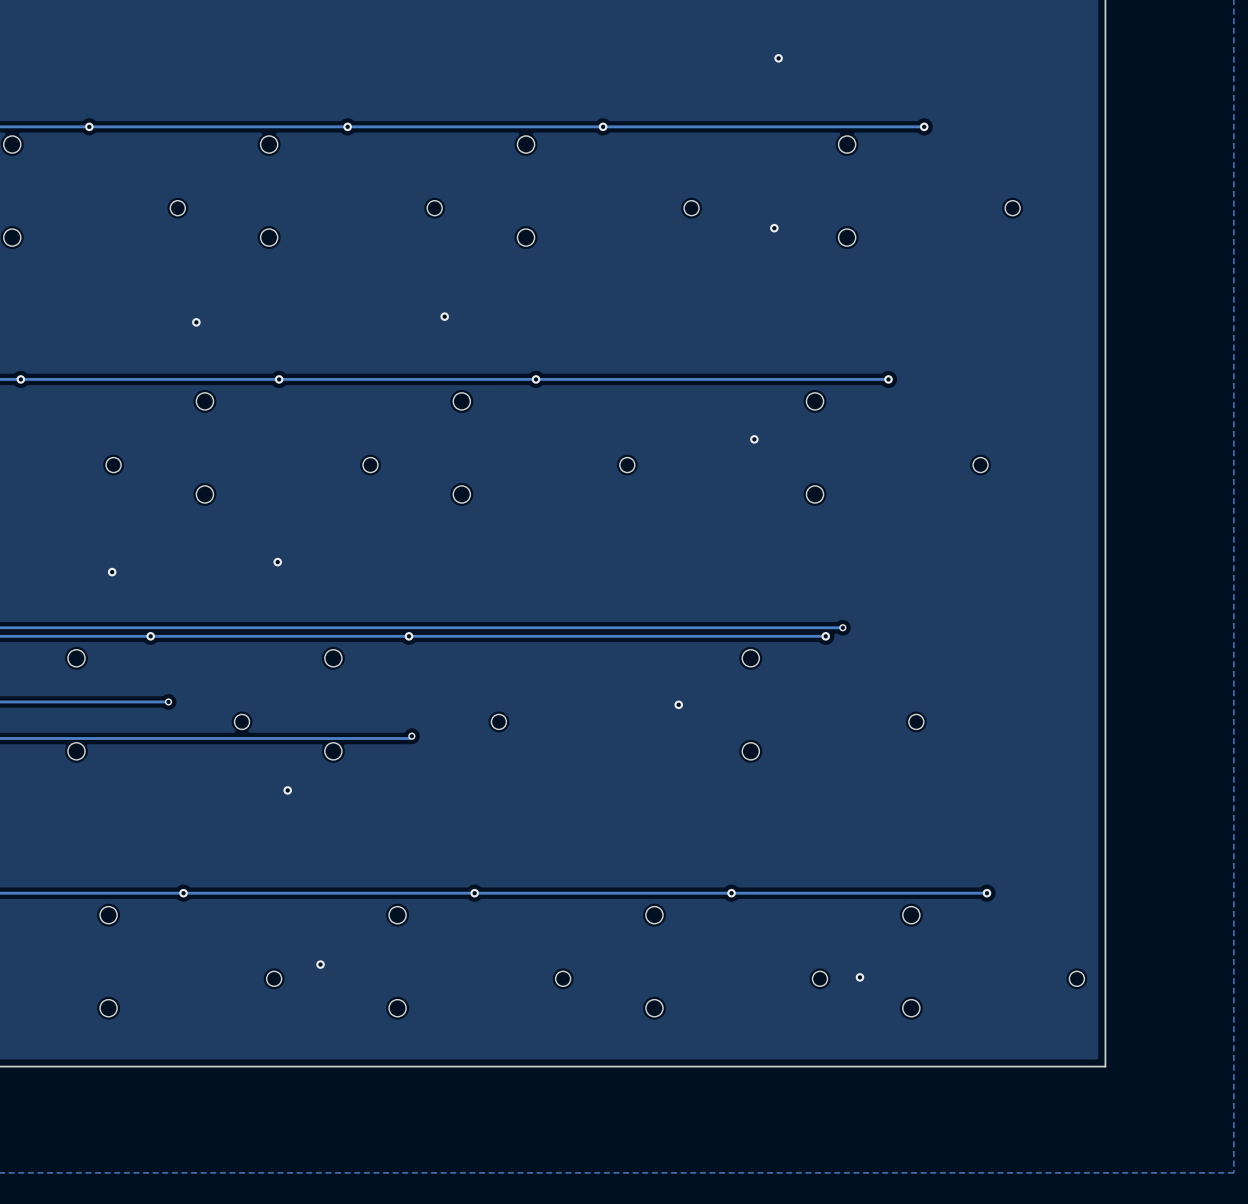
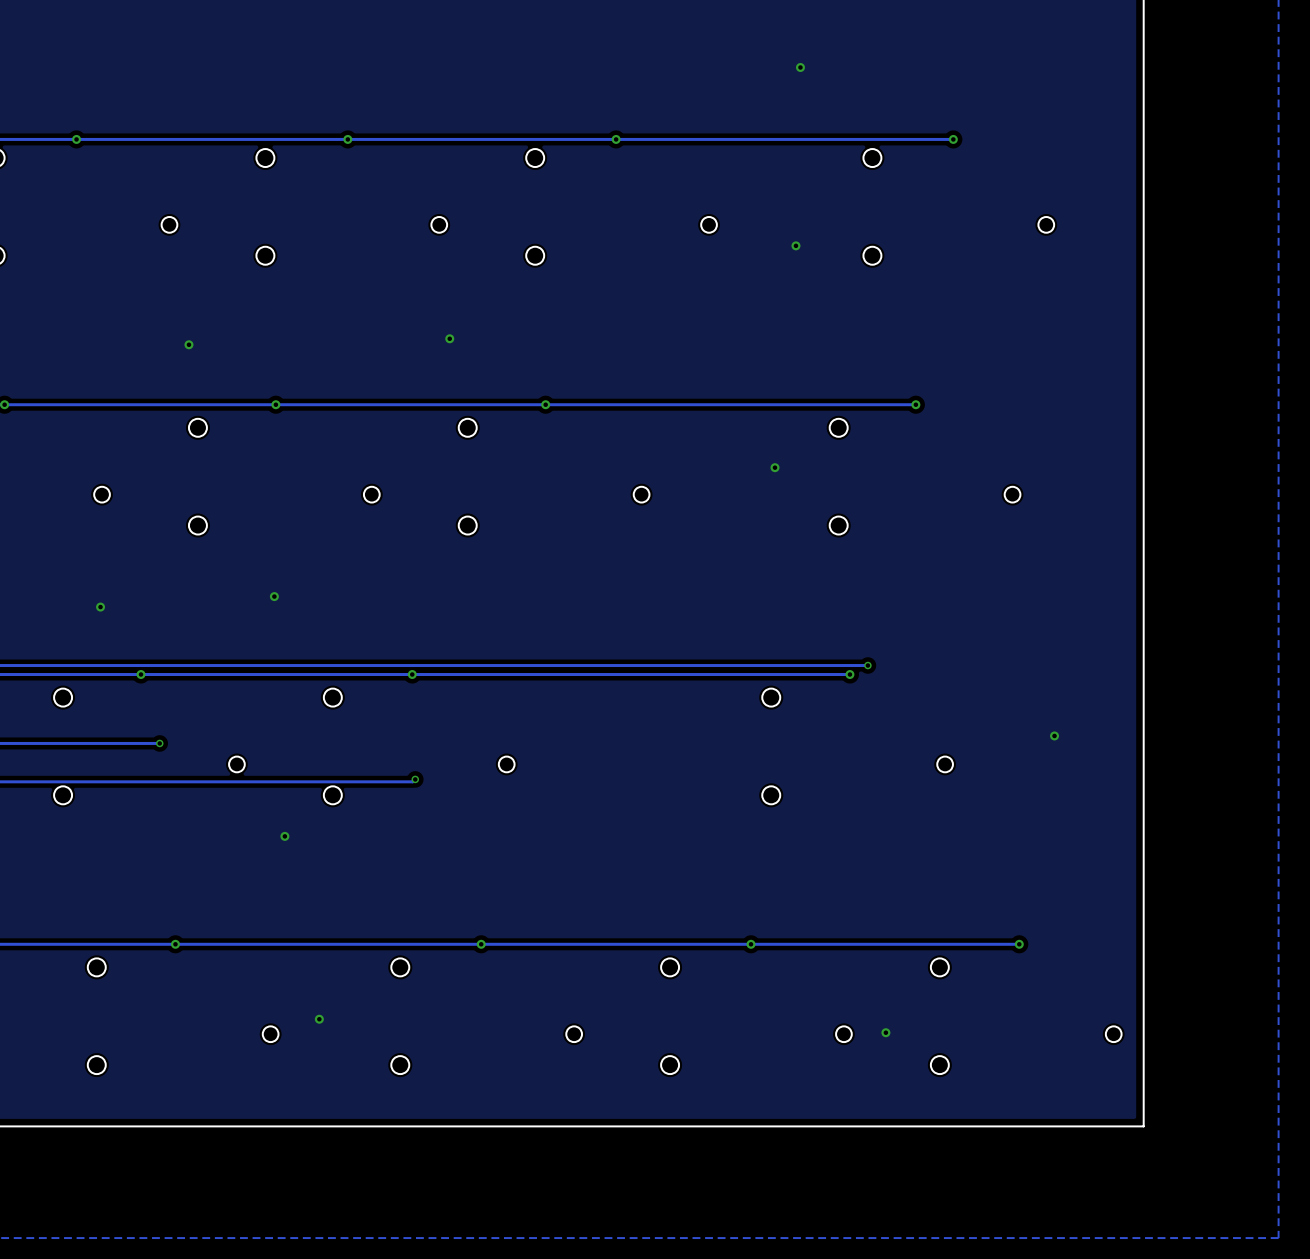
via: none -> (1054, 735)
via: (678, 704) -> none

